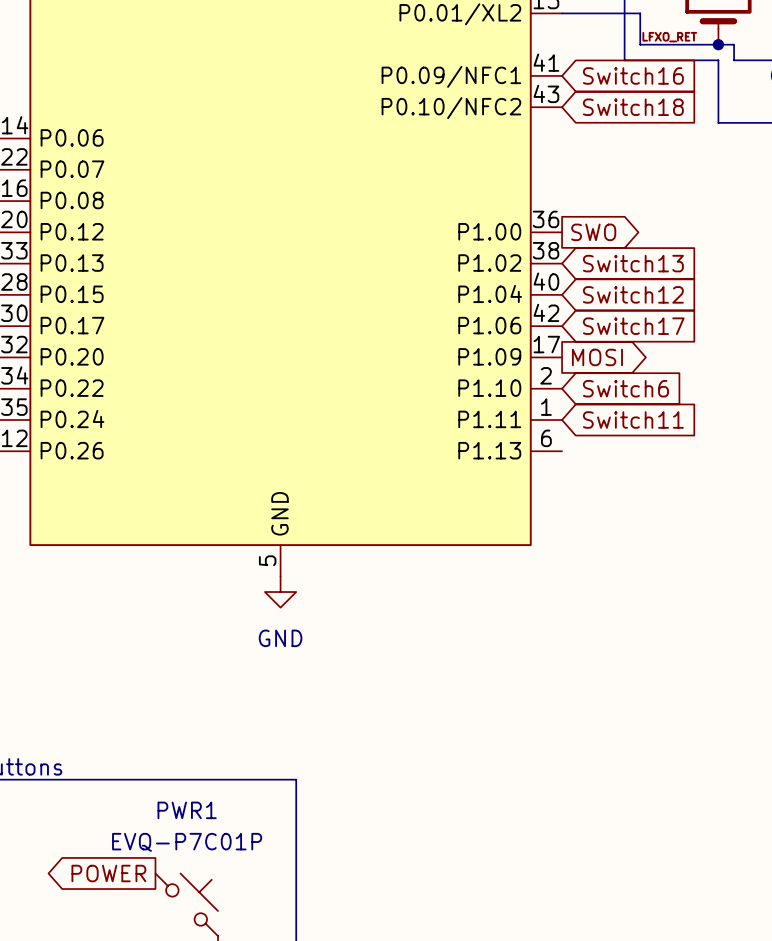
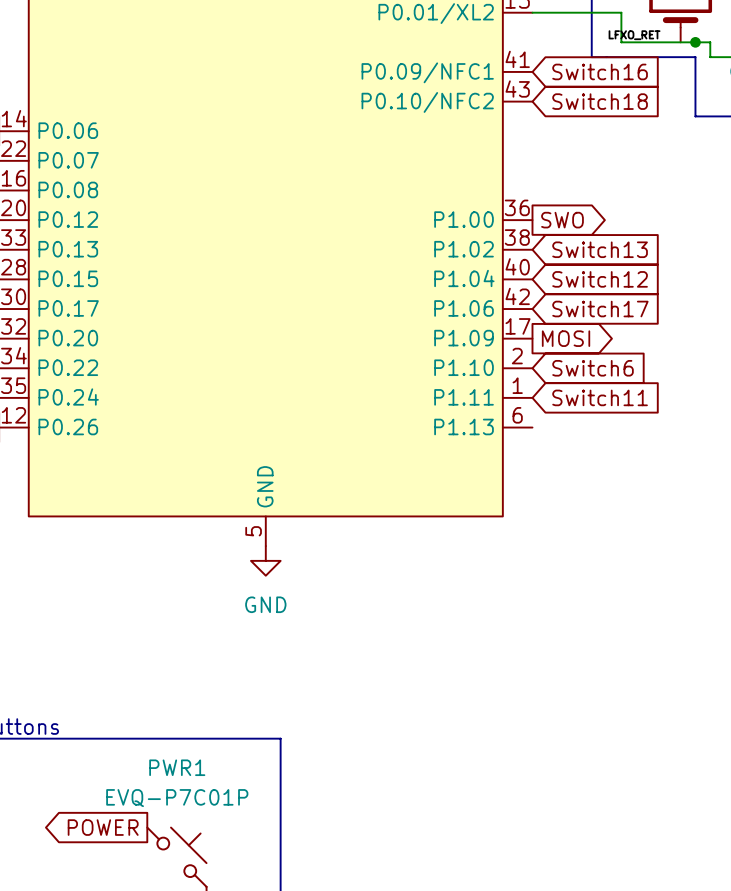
wire: (640, 13) (640, 44) (655, 44) -> (606, 12) (621, 12) (621, 42)
junction position: (718, 44) -> (695, 42)
wire: (734, 44) (734, 60) (749, 60) -> (695, 42) (710, 42) (710, 57)
line: (718, 60) (718, 122) (734, 122) -> (680, 57) (695, 57) (695, 116)

